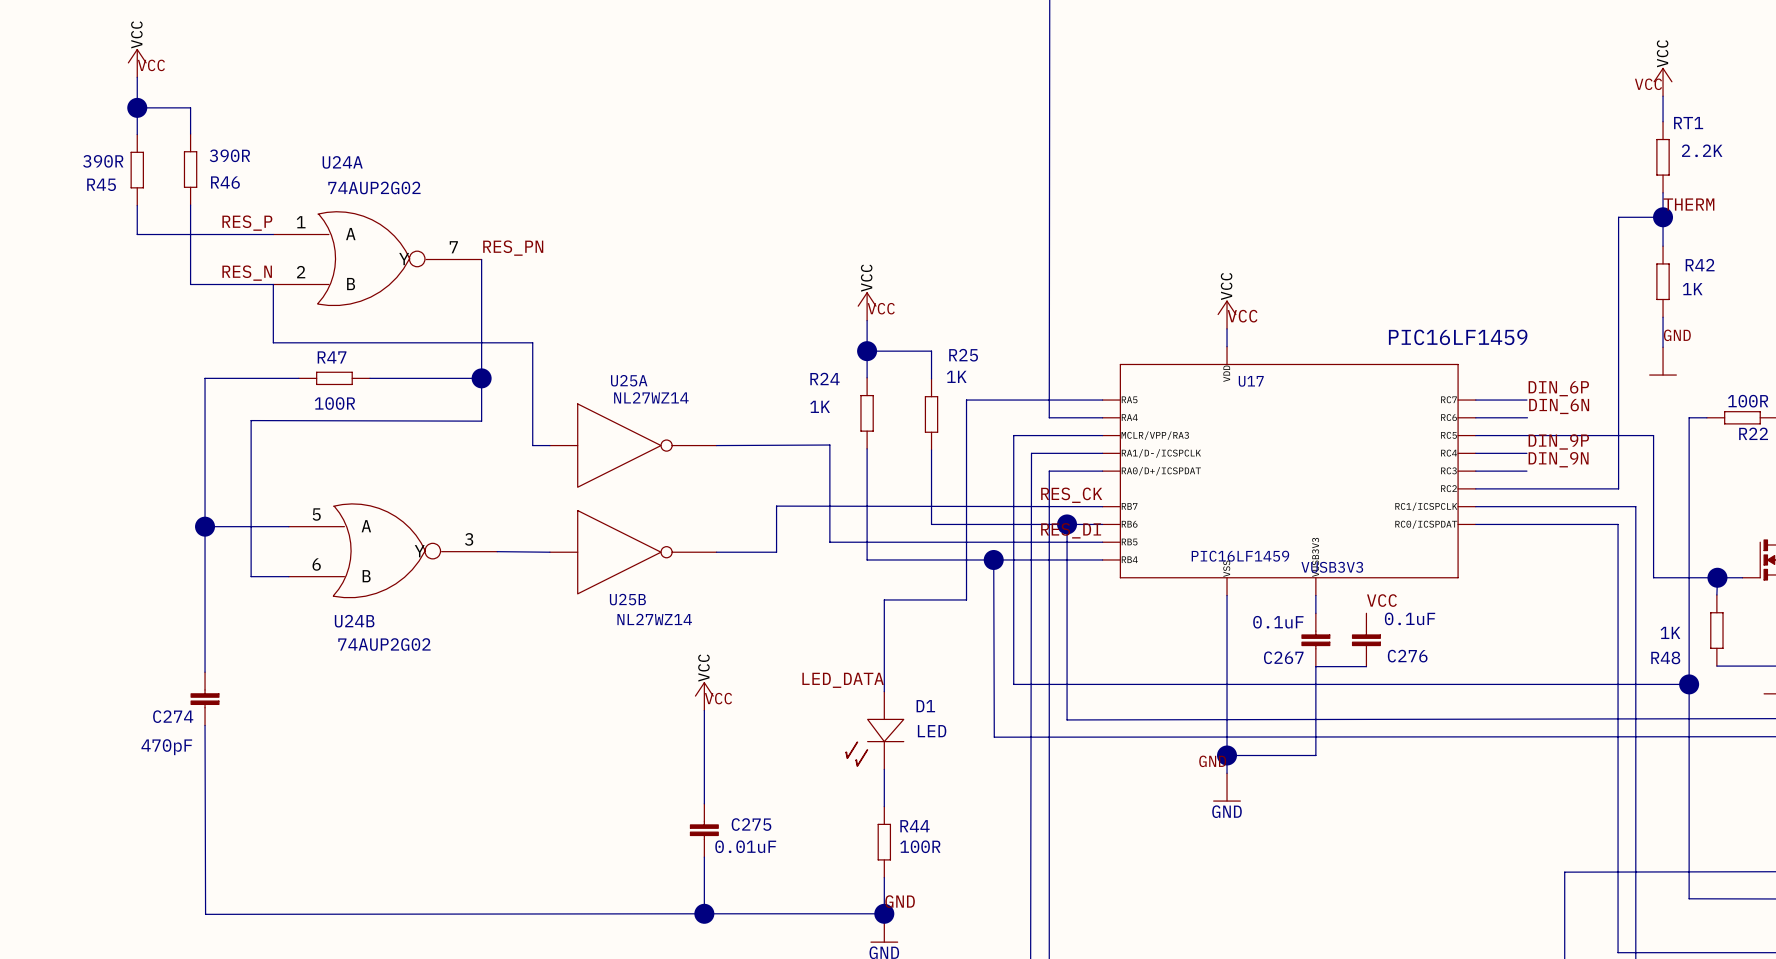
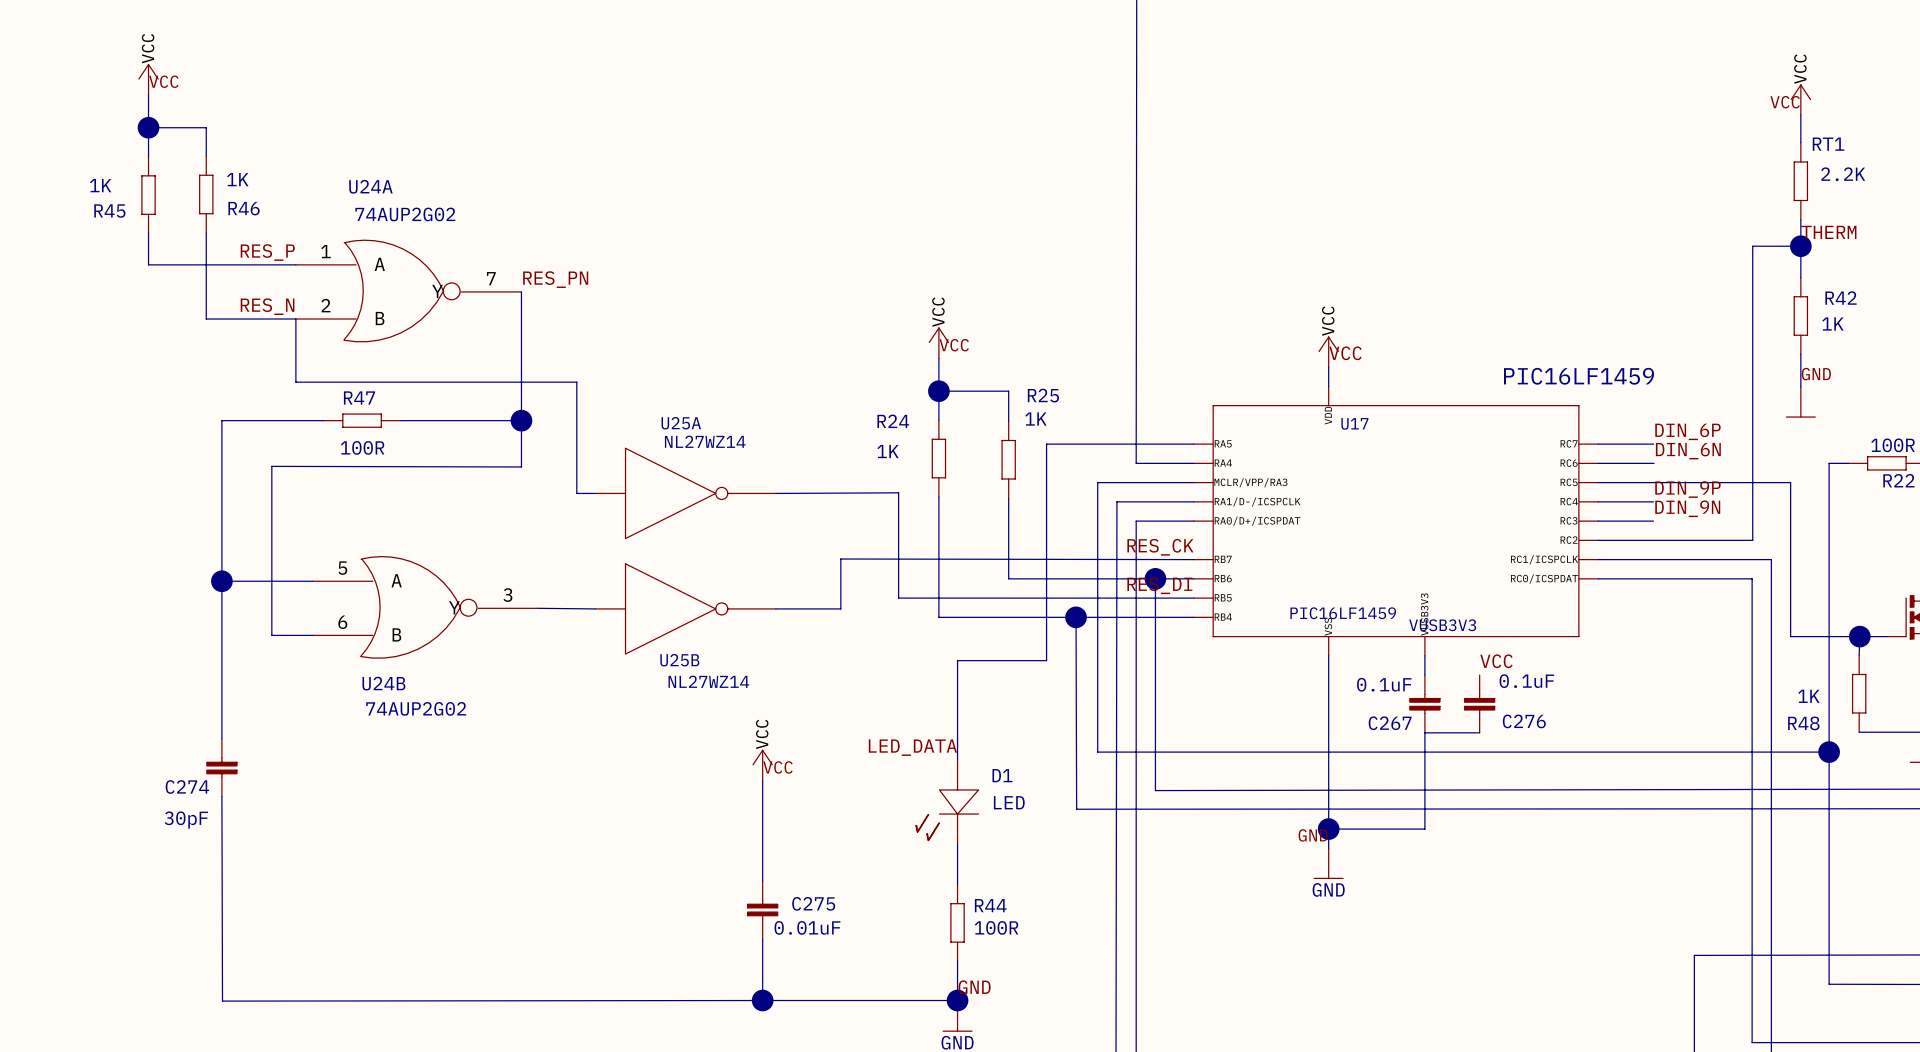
R46 value: 390R (229, 155) -> 1K (237, 179)
R45 value: 390R (103, 161) -> 1K (100, 185)
C274 value: 470pF (166, 747) -> 30pF (186, 820)

